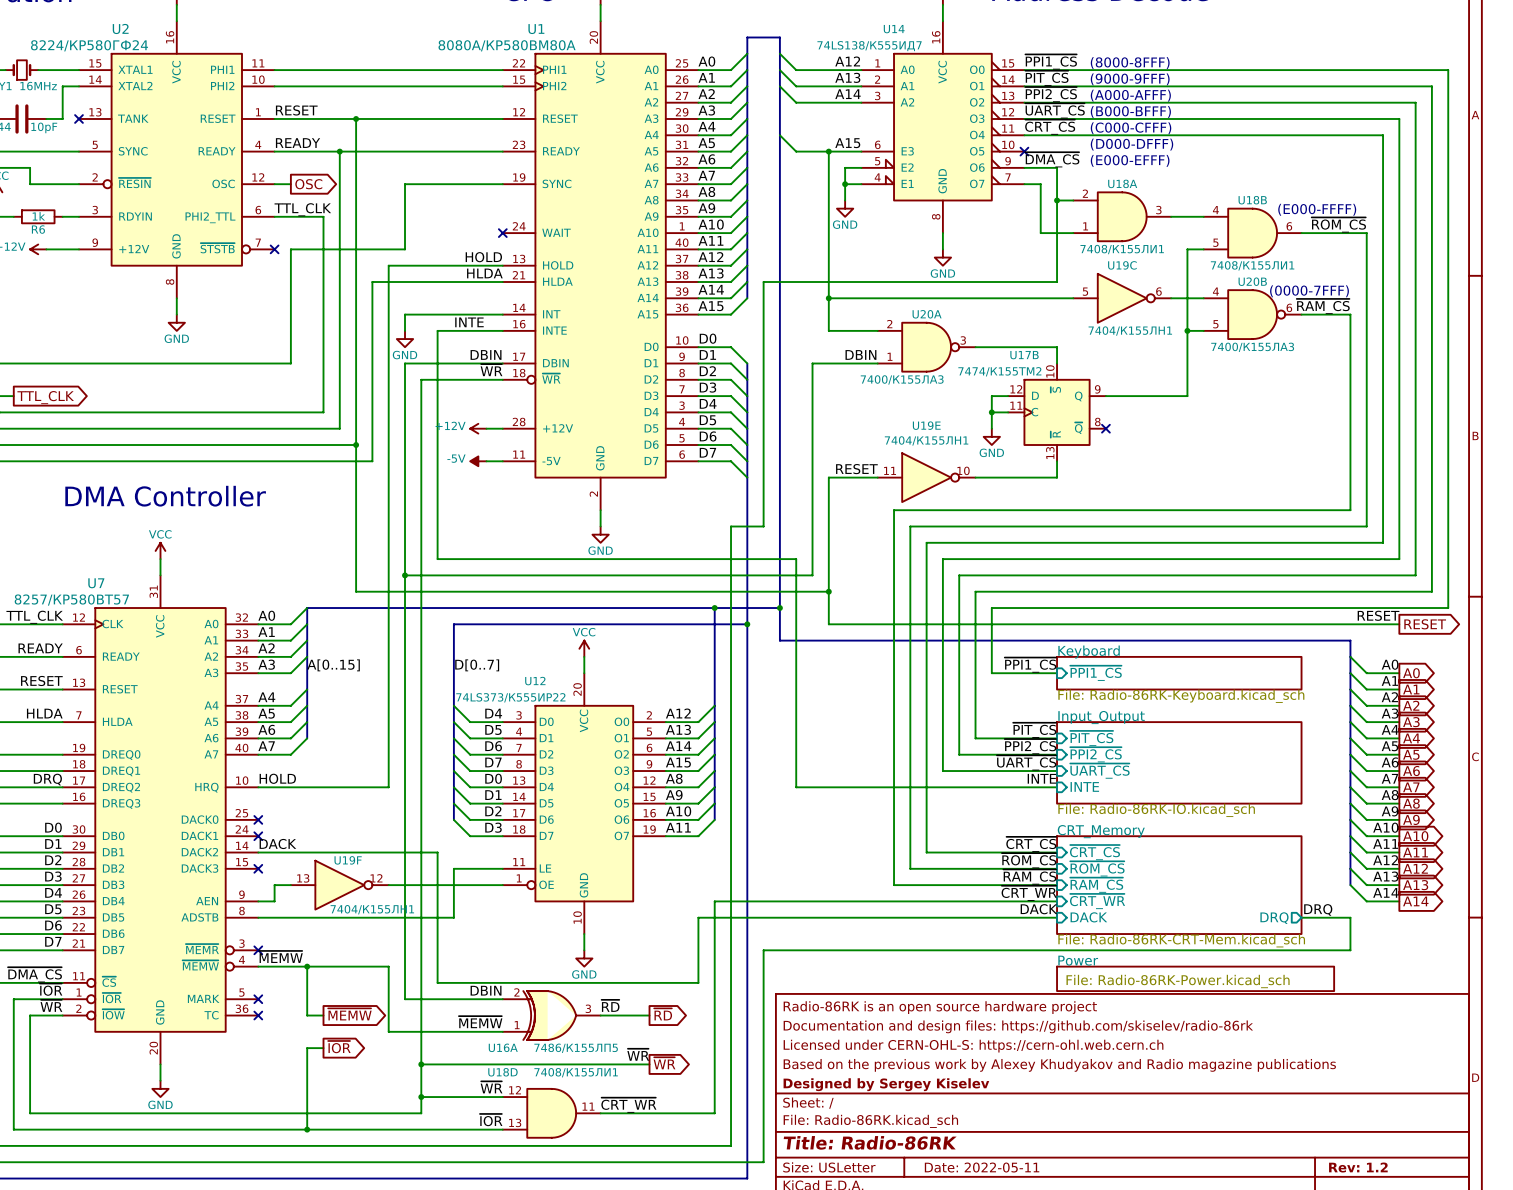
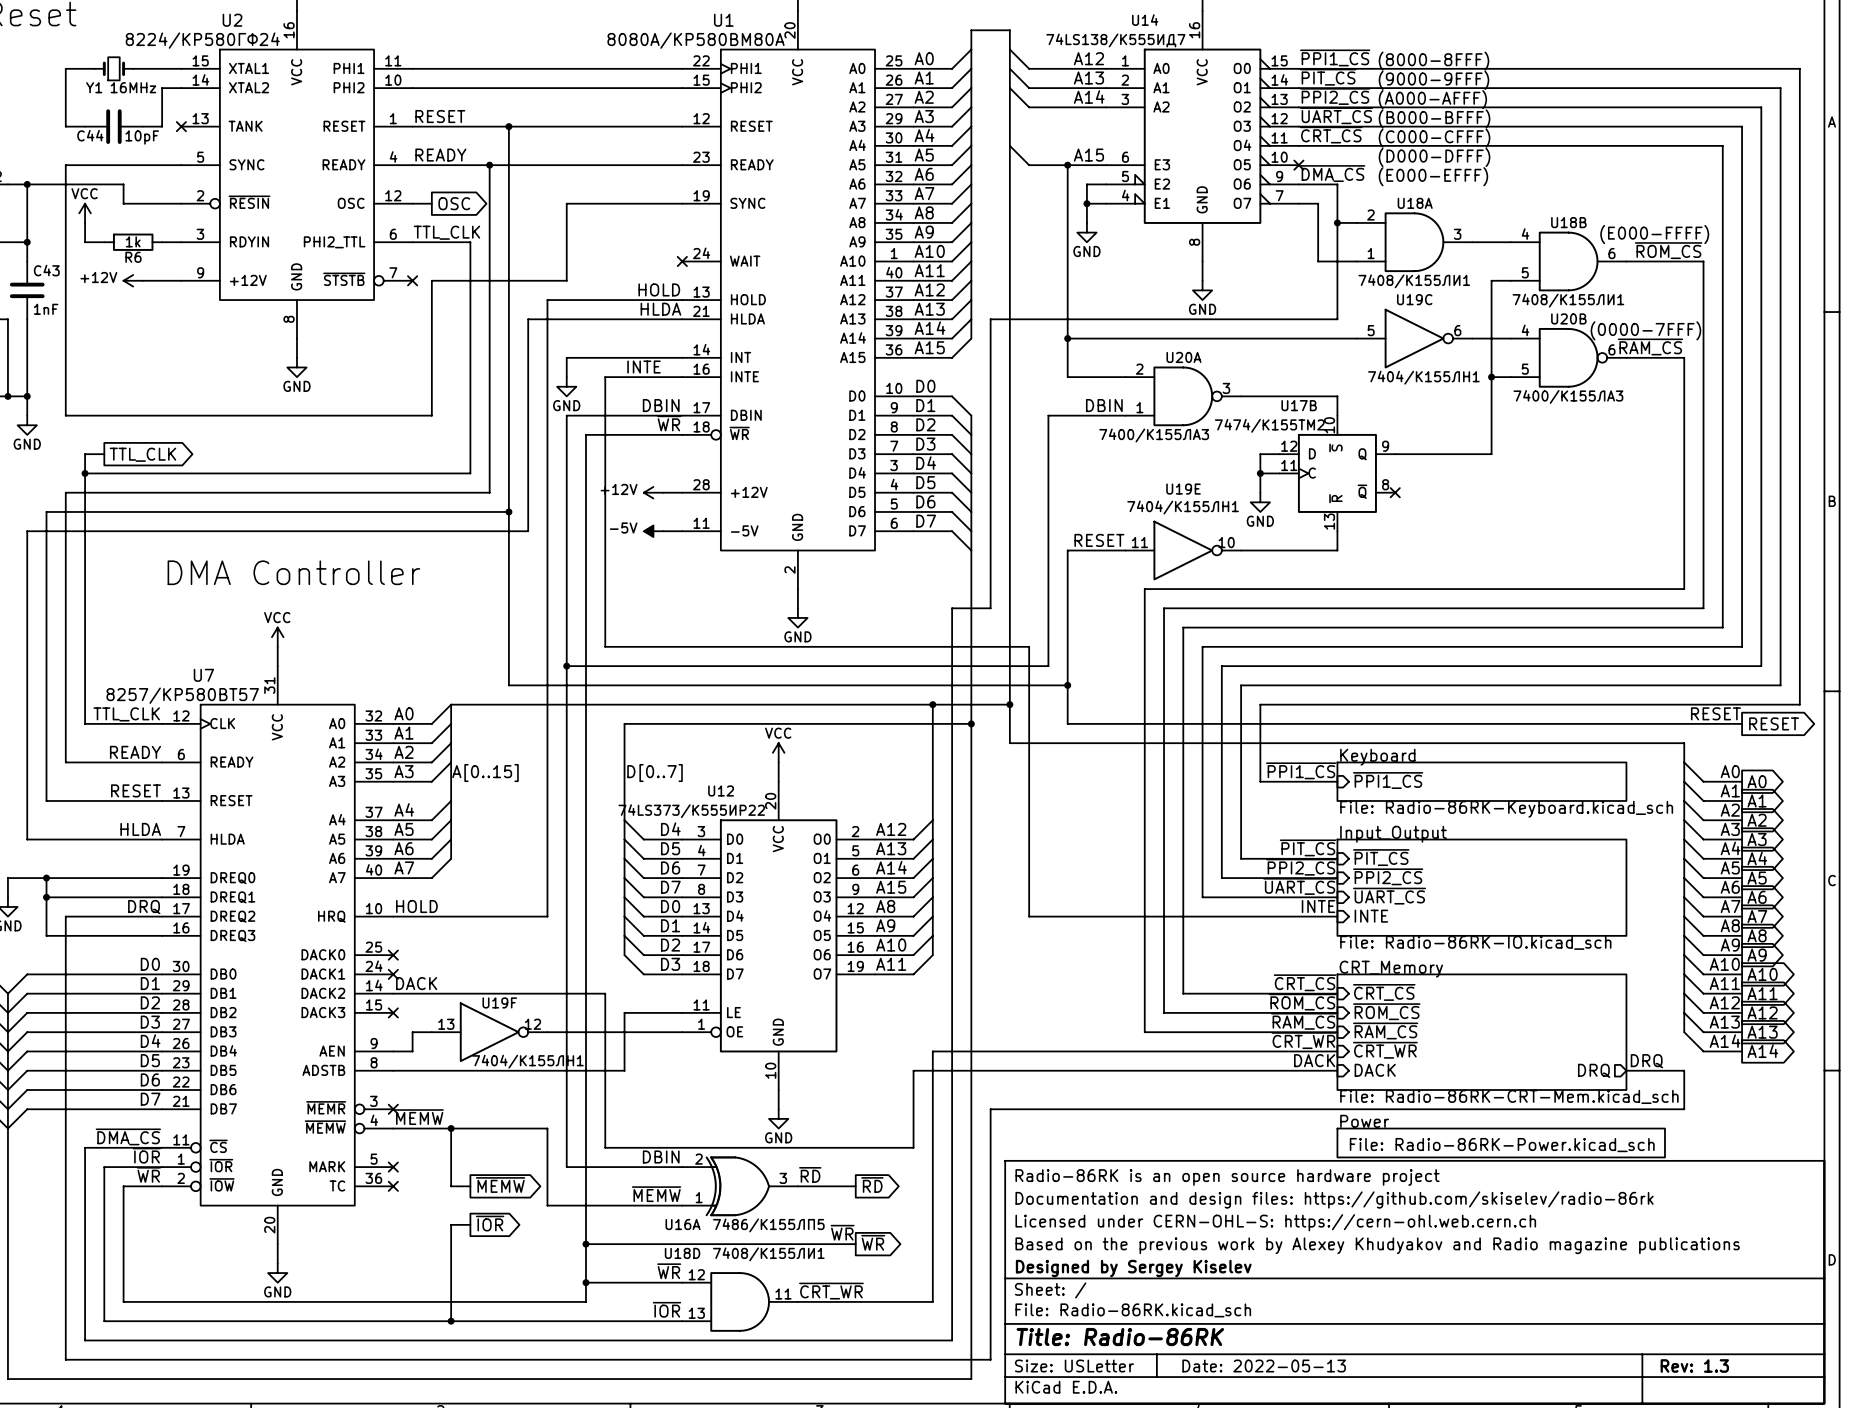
title block: Date: 2022-05-11 (982, 1167) -> Date: 2022-05-13 (1264, 1366)
title block: Rev: 1.2 (1358, 1167) -> Rev: 1.3 (1694, 1366)

